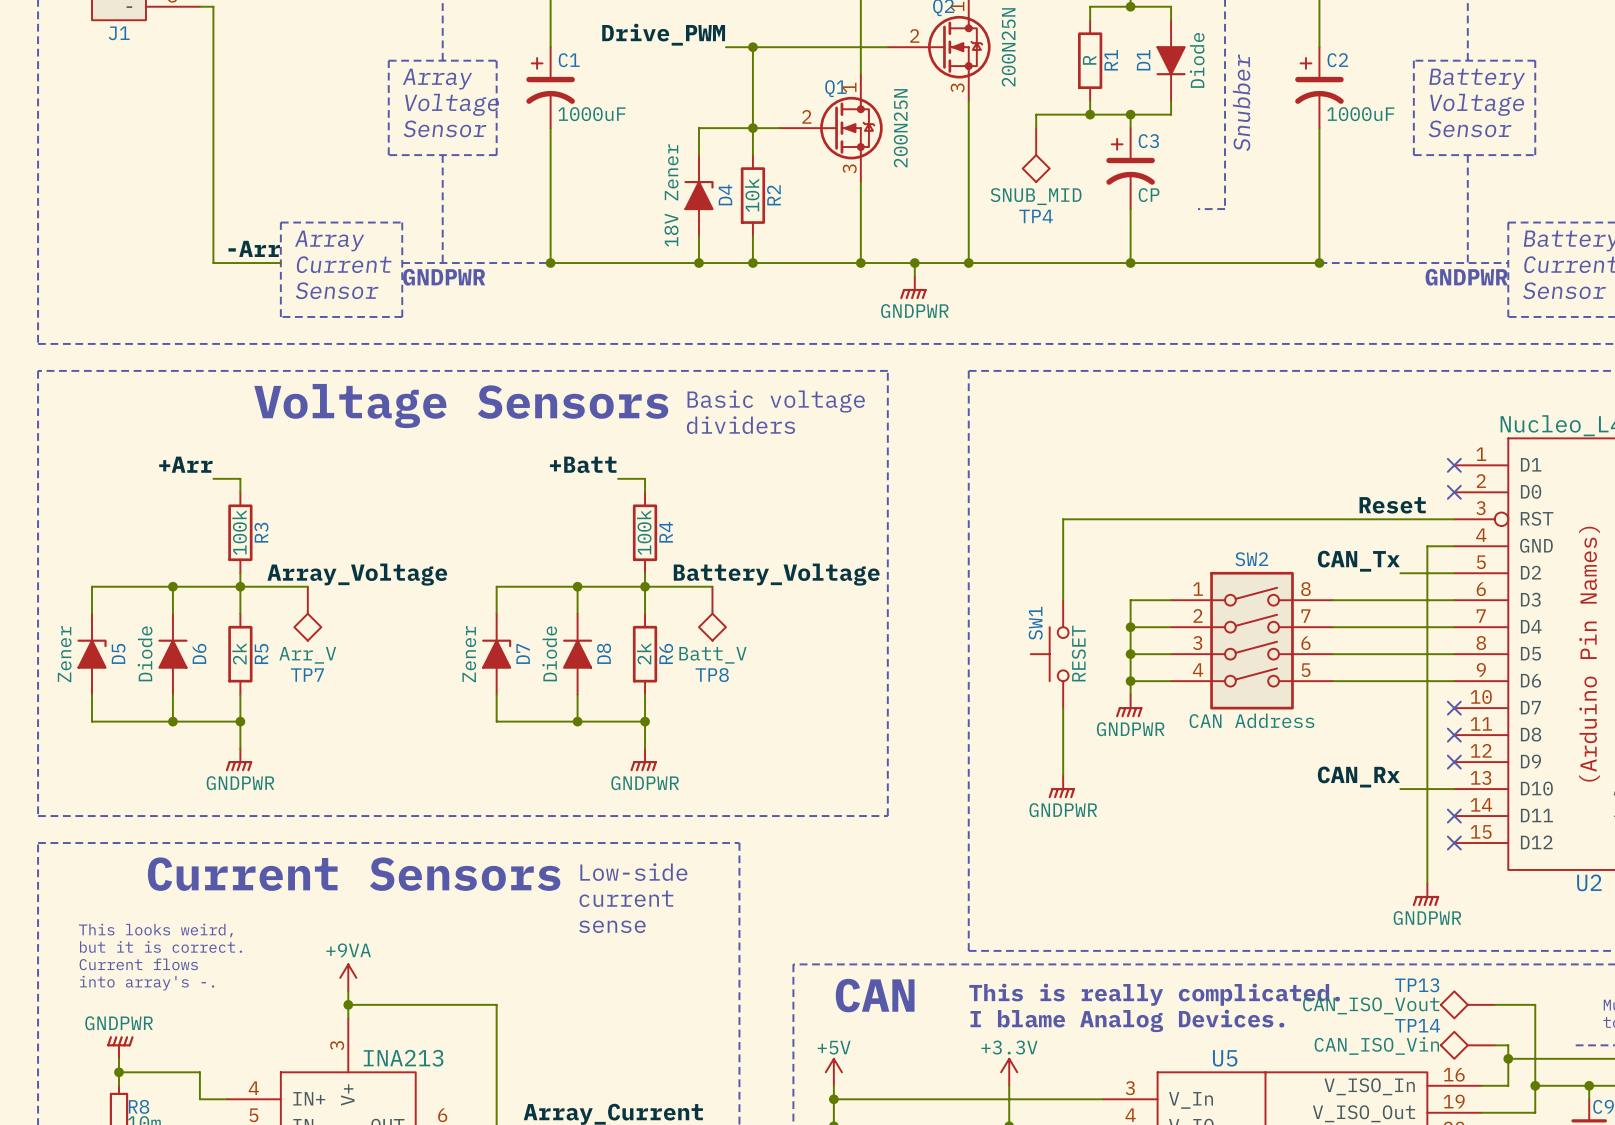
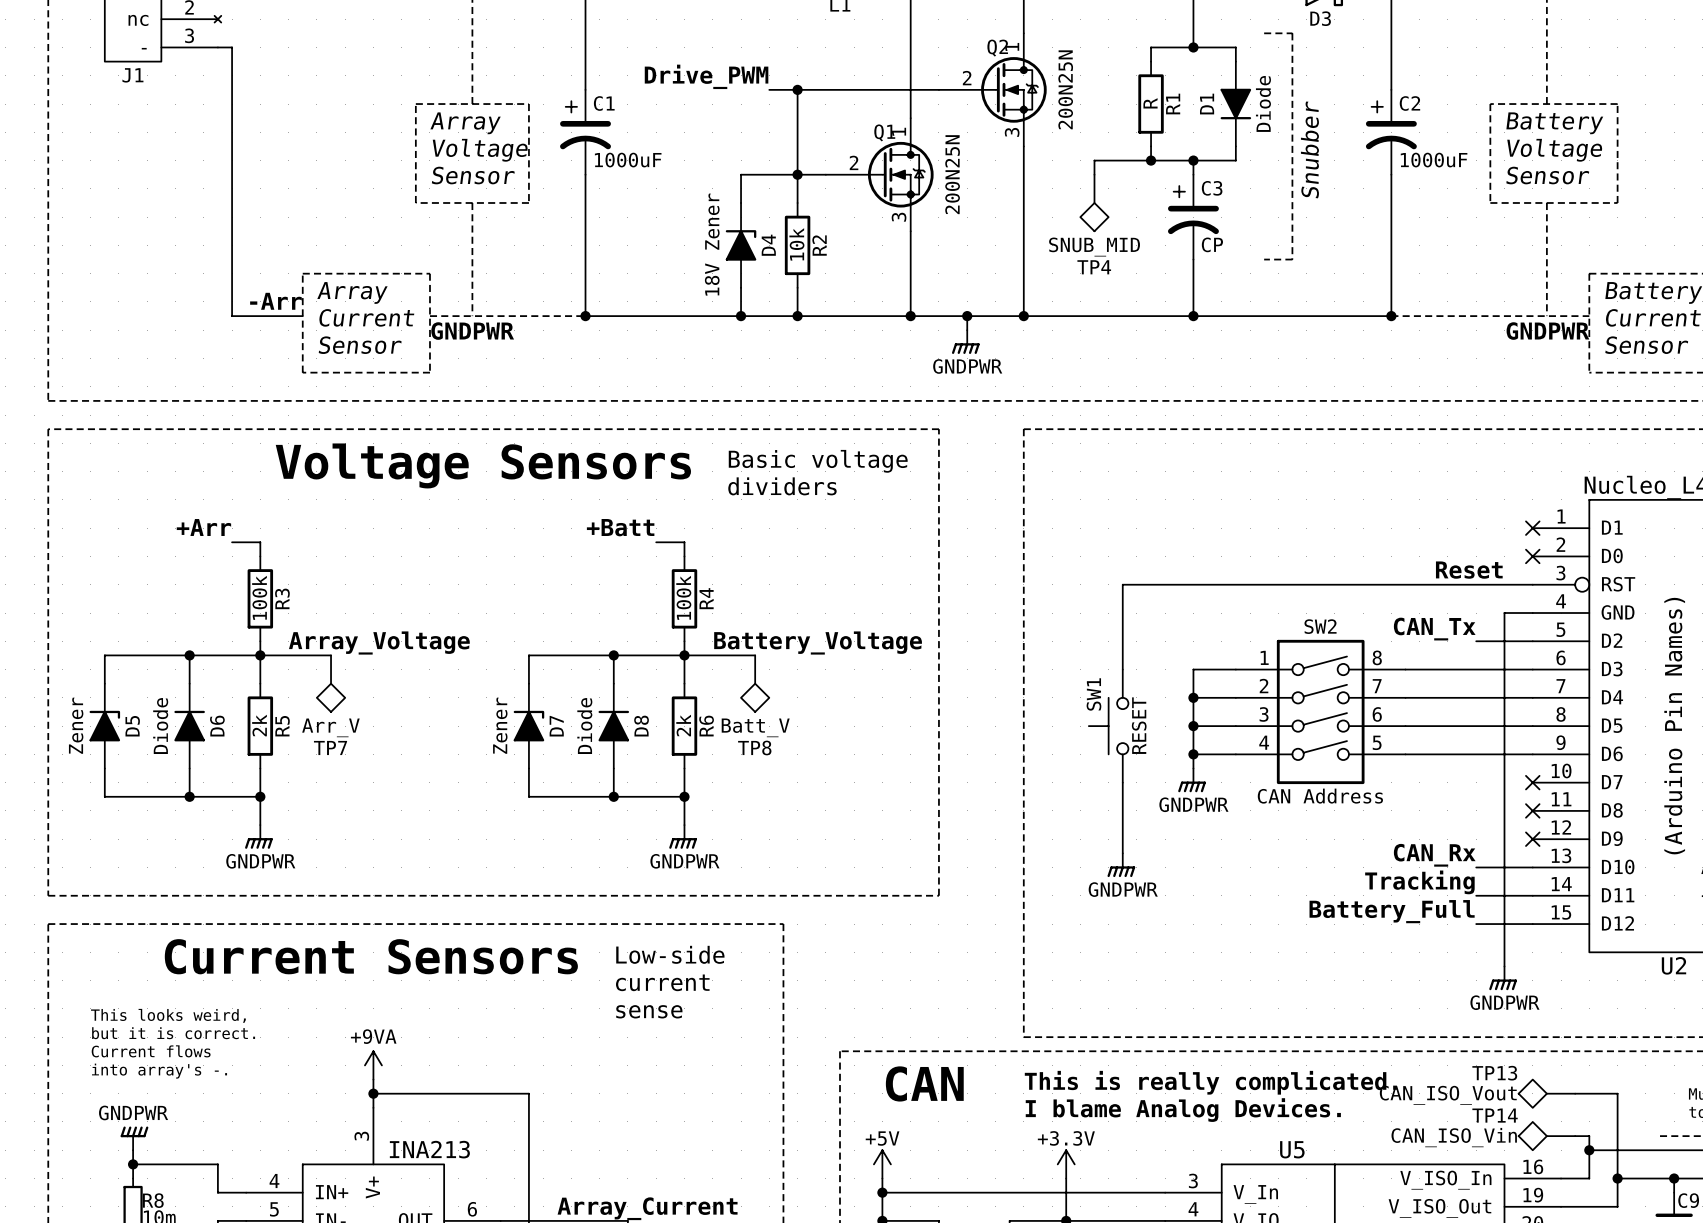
label: none -> Tracking (1419, 882)
wire: none -> (1476, 895) (1532, 895)
no-connect mark: (1454, 816) -> none
label: none -> Battery_Full (1392, 911)
wire: none -> (1476, 924) (1532, 924)
no-connect mark: (1454, 843) -> none

